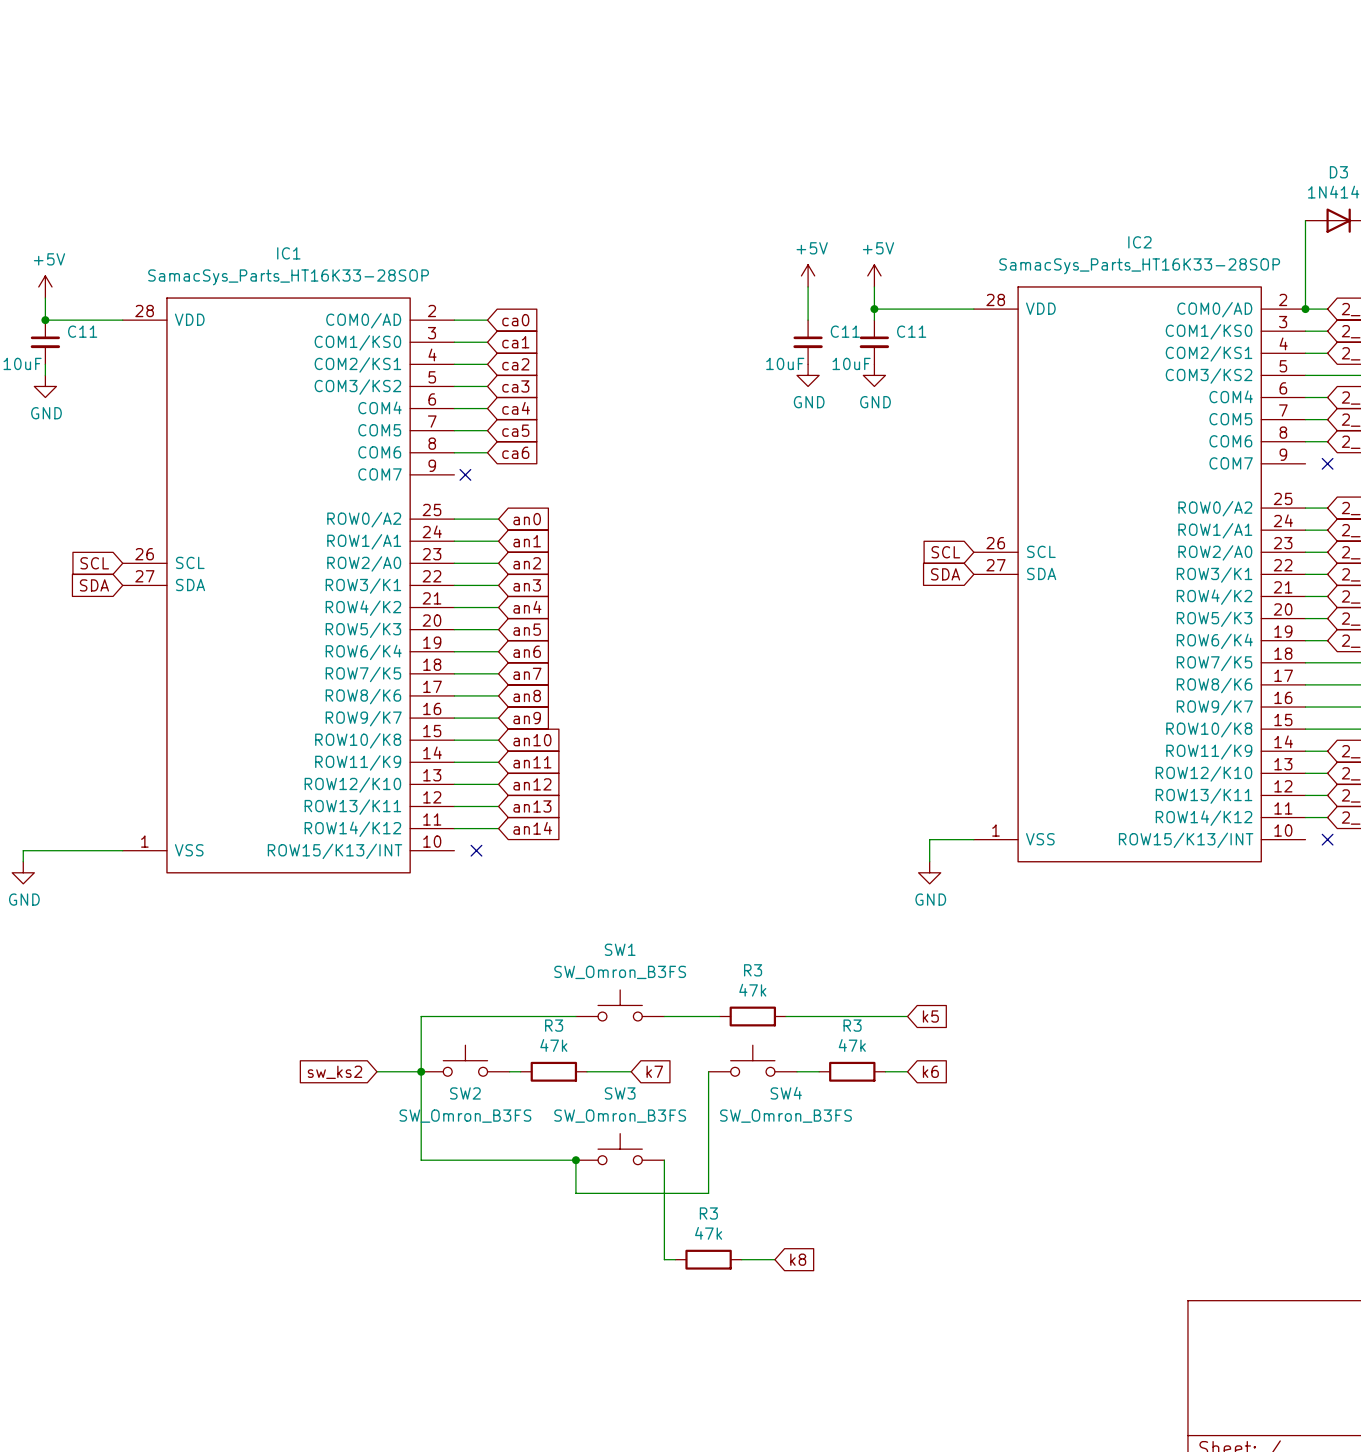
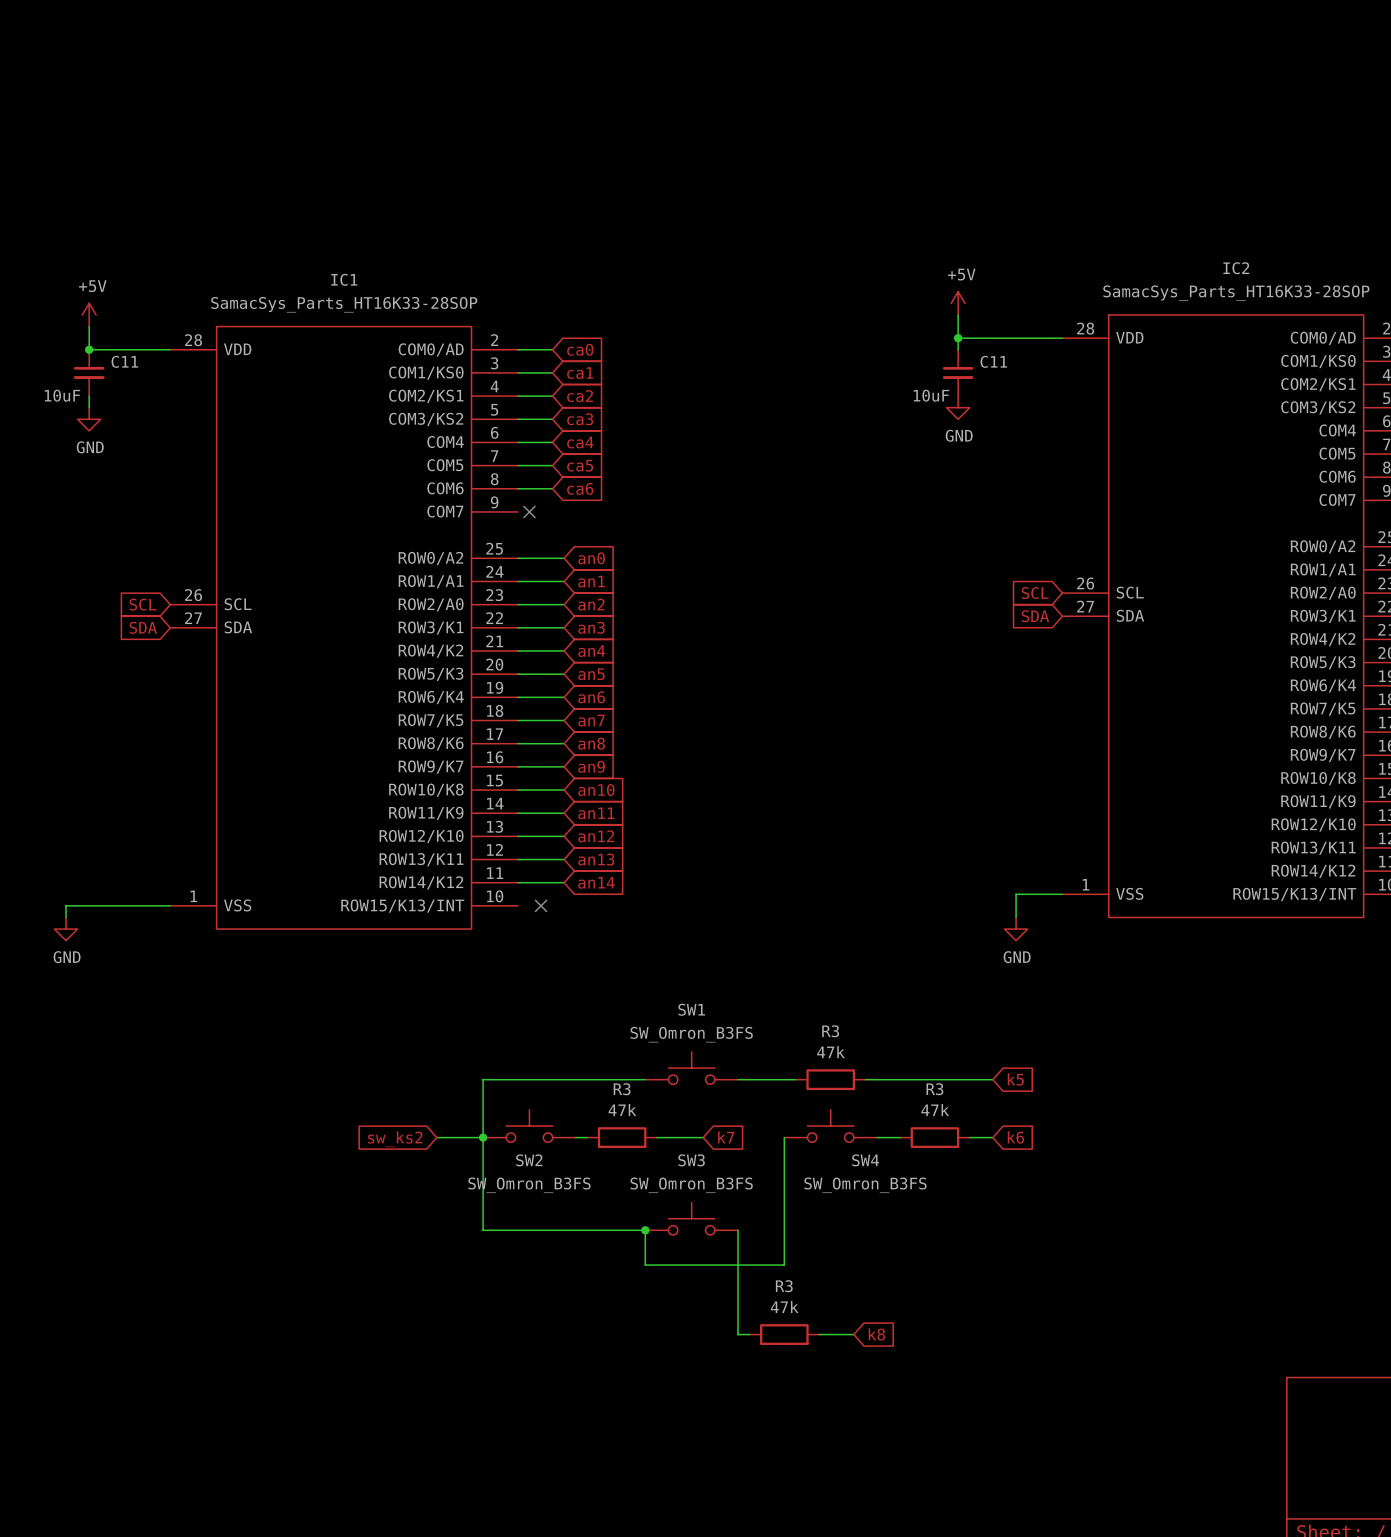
power symbol: +5V (808, 275) -> none
wire: (808, 286) (808, 320) -> none
C11: 10uF (808, 342) -> none
power symbol: GND (808, 375) -> none

